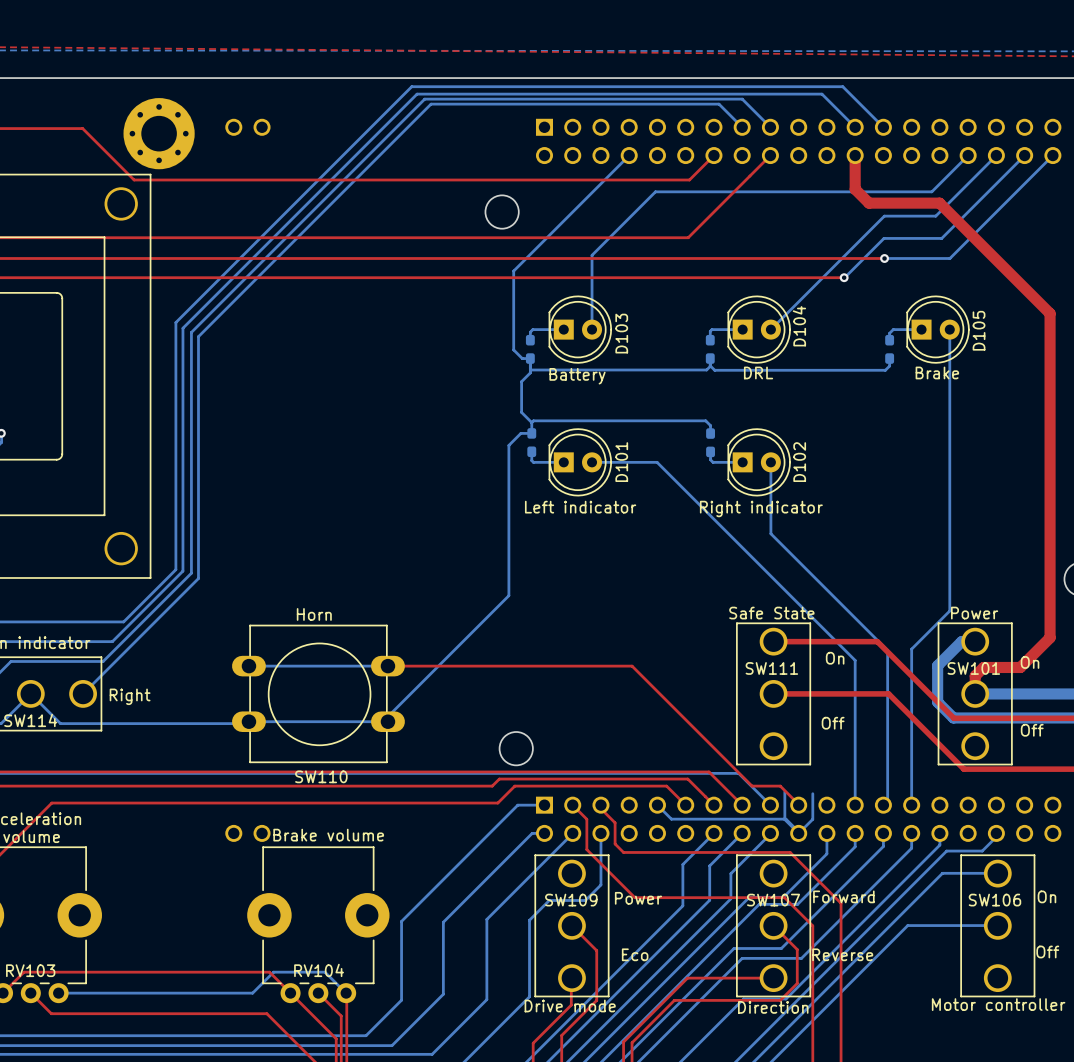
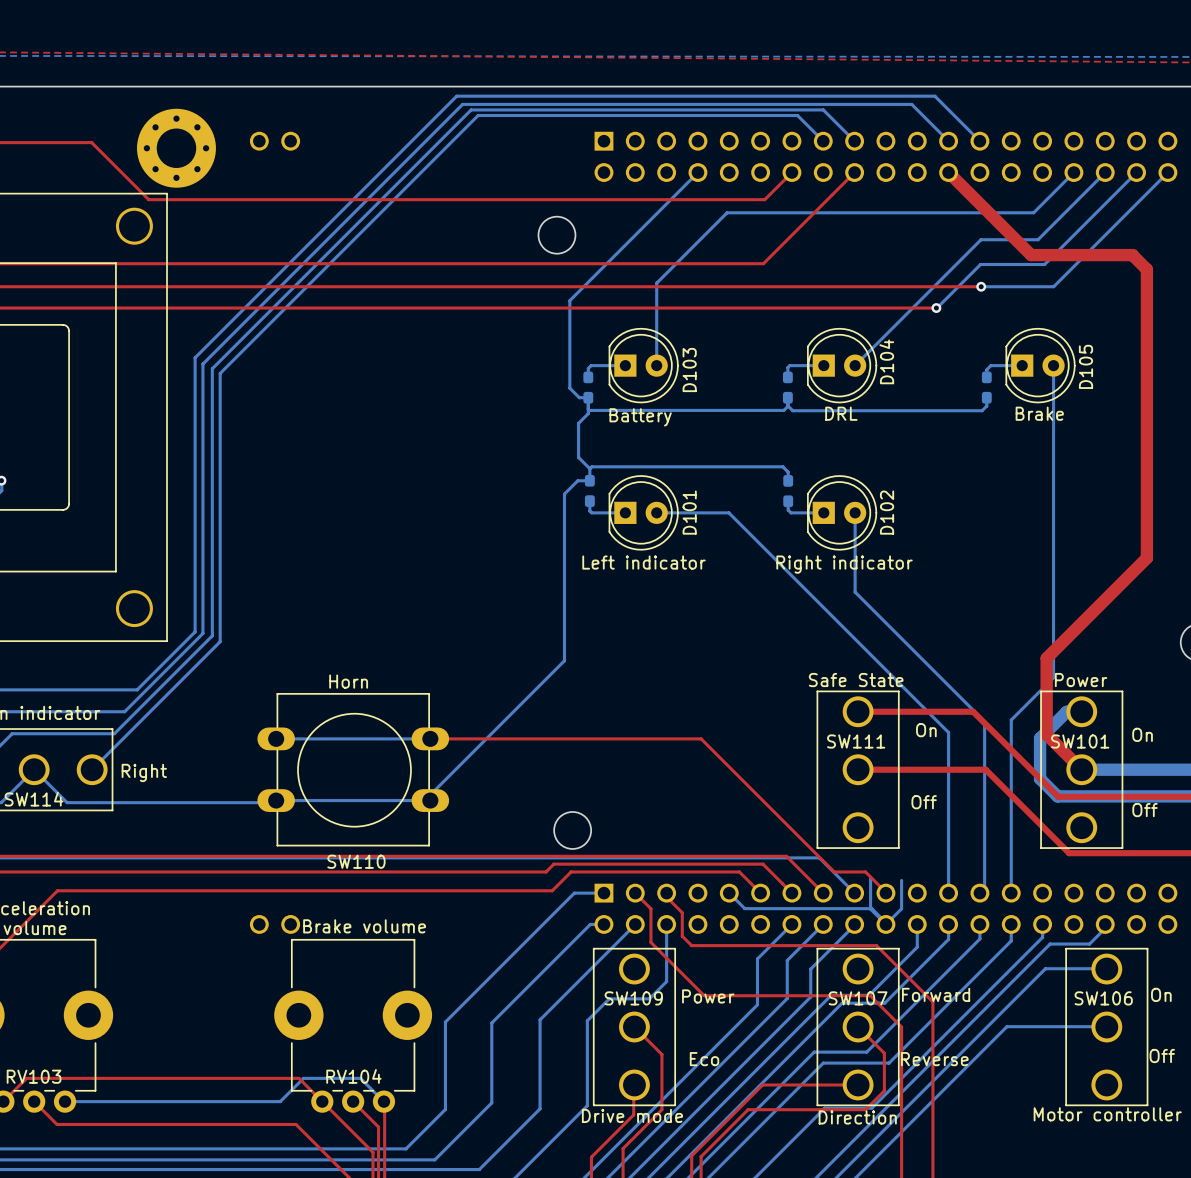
top track: (855, 155) (855, 189) (869, 203) (939, 203) (1050, 313) (1050, 637) (1020, 667) (983, 667) (975, 675) (975, 693) -> (948, 172) (1031, 255) (1132, 255) (1146, 269) (1146, 558) (1046, 658) (1046, 734) (1081, 769)

